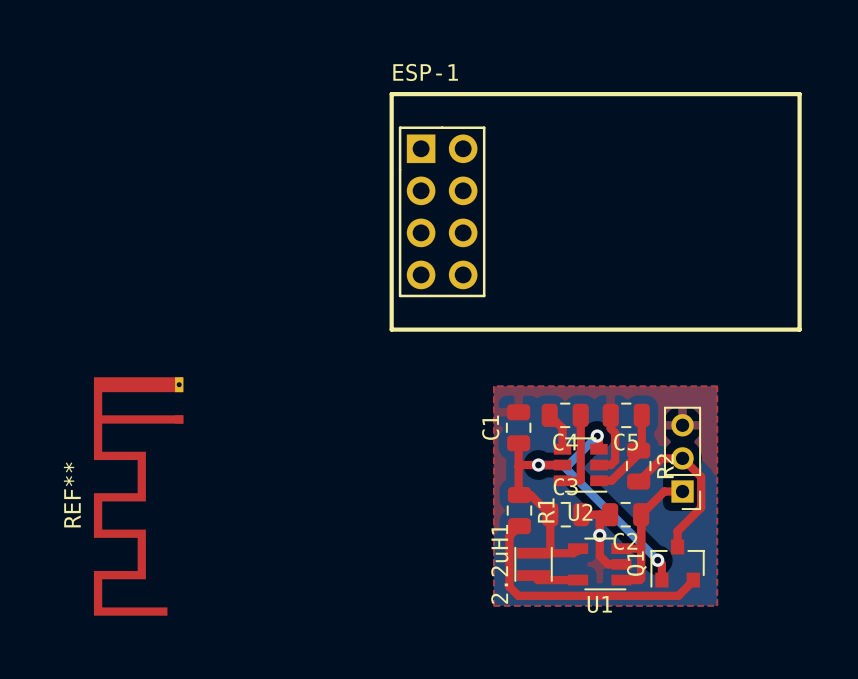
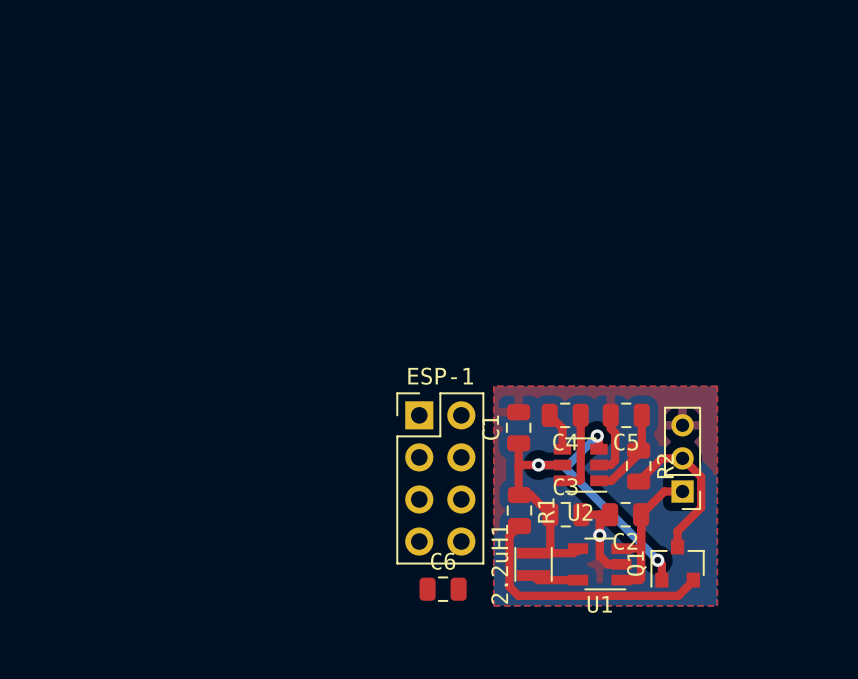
ESP-1 name position: ESP-1 (425, 72) -> ESP-1 (440, 376)
ESP-1 footprint: [389, 92, 802, 332] -> [396, 392, 485, 565]
REF**: (138, 496) -> none
C6: none -> (443, 589)

